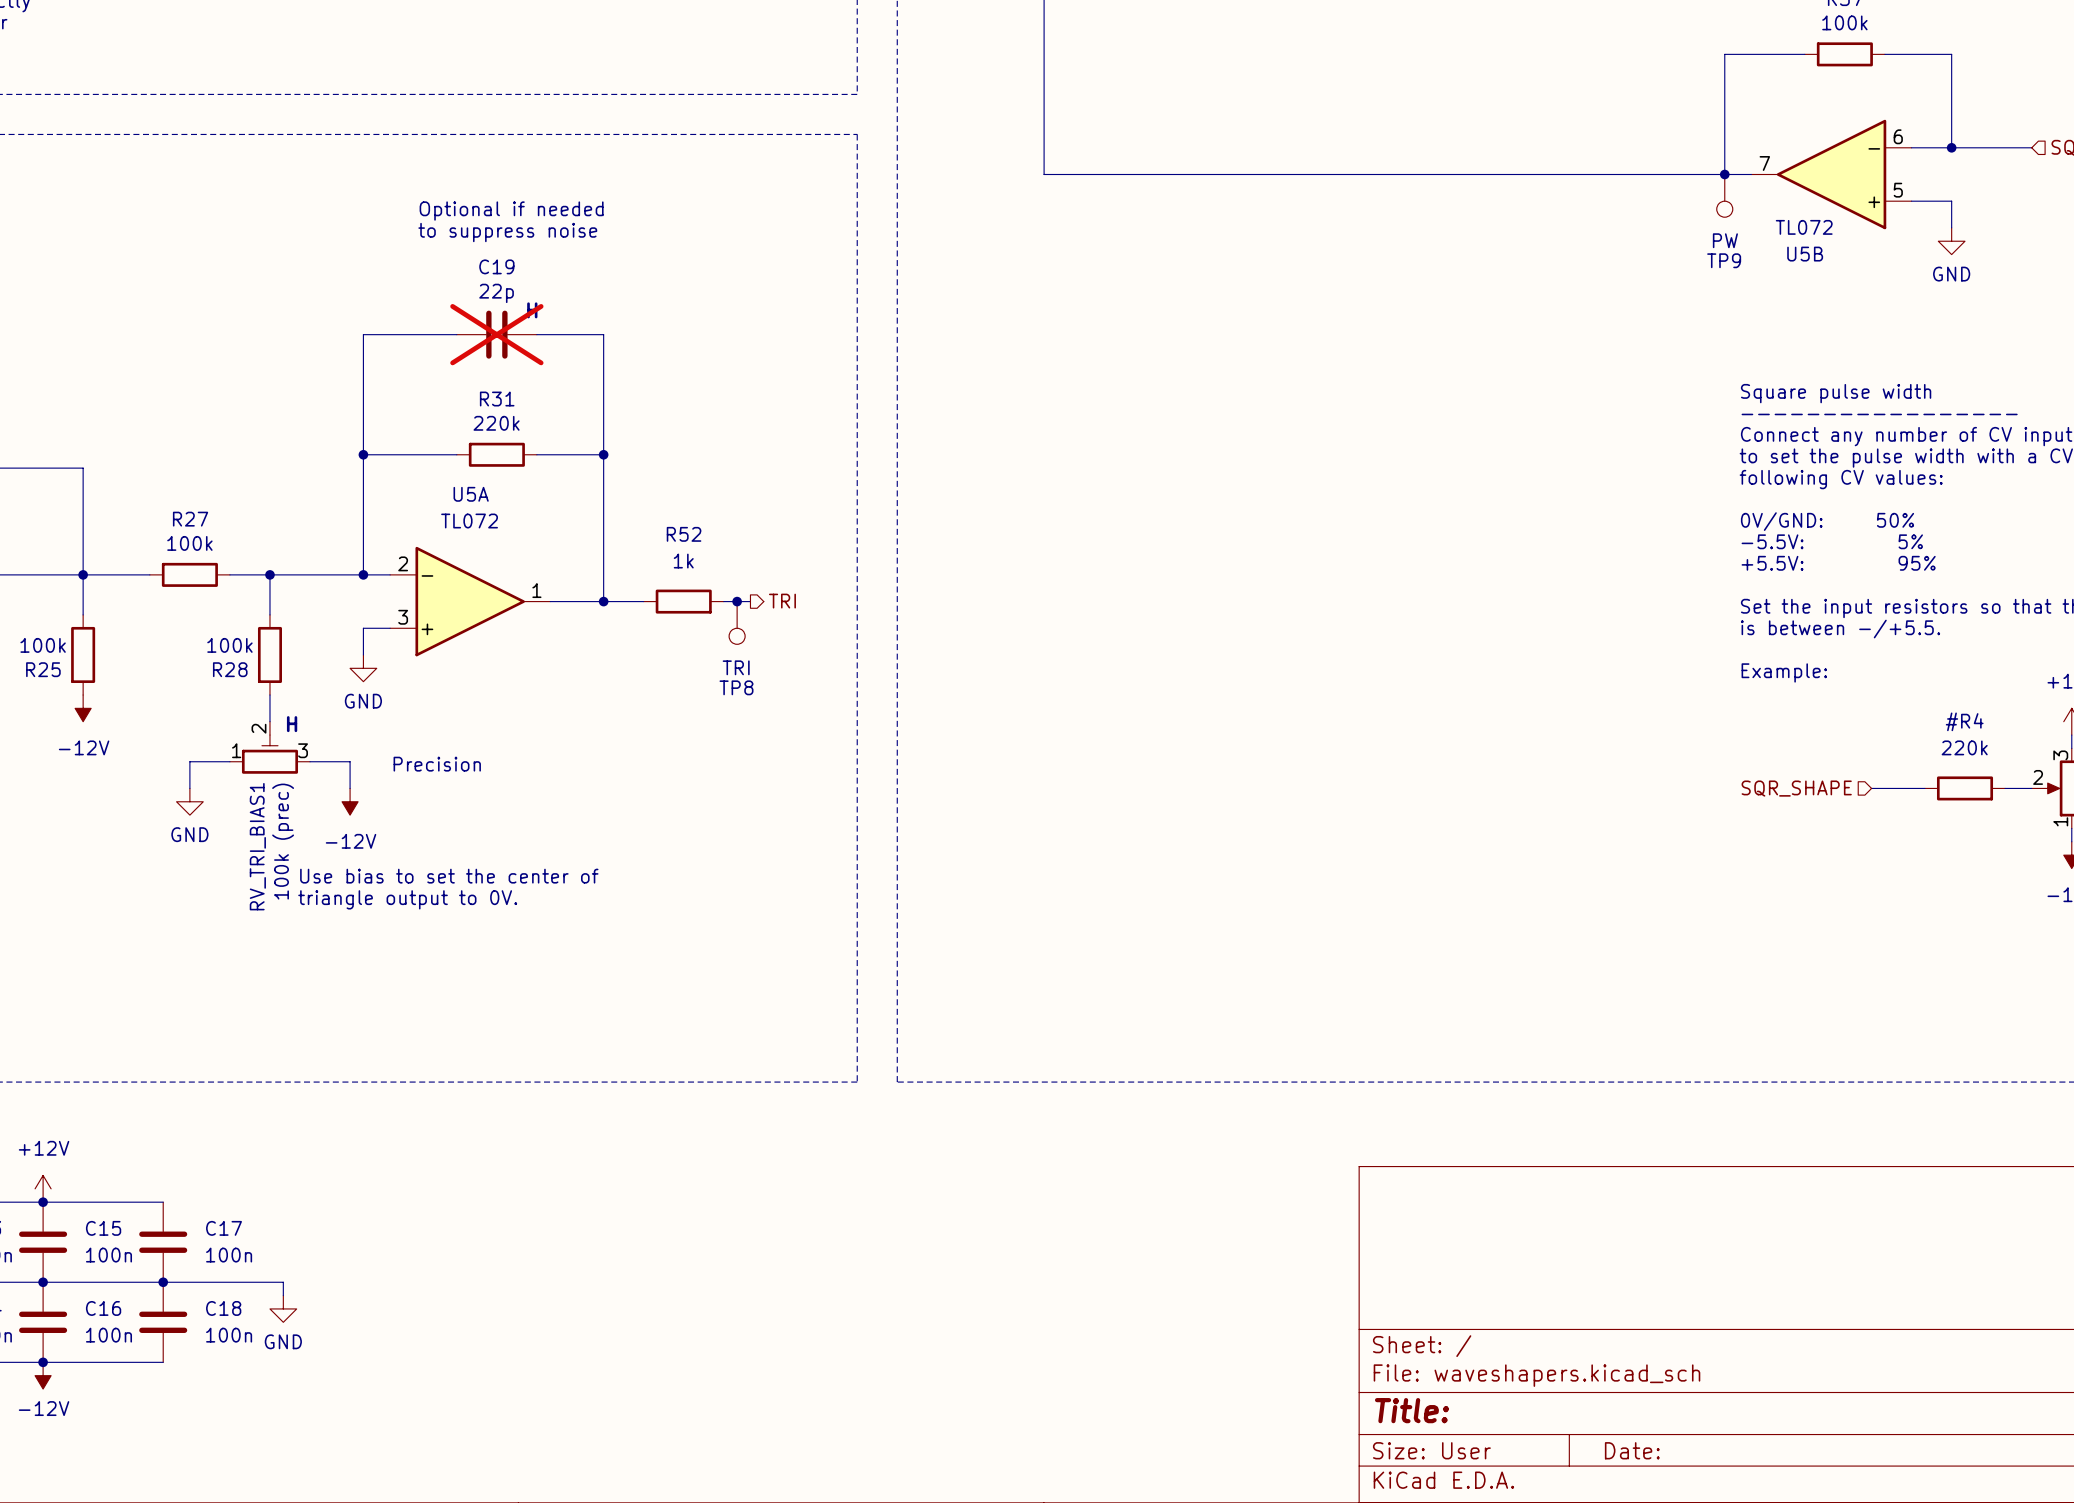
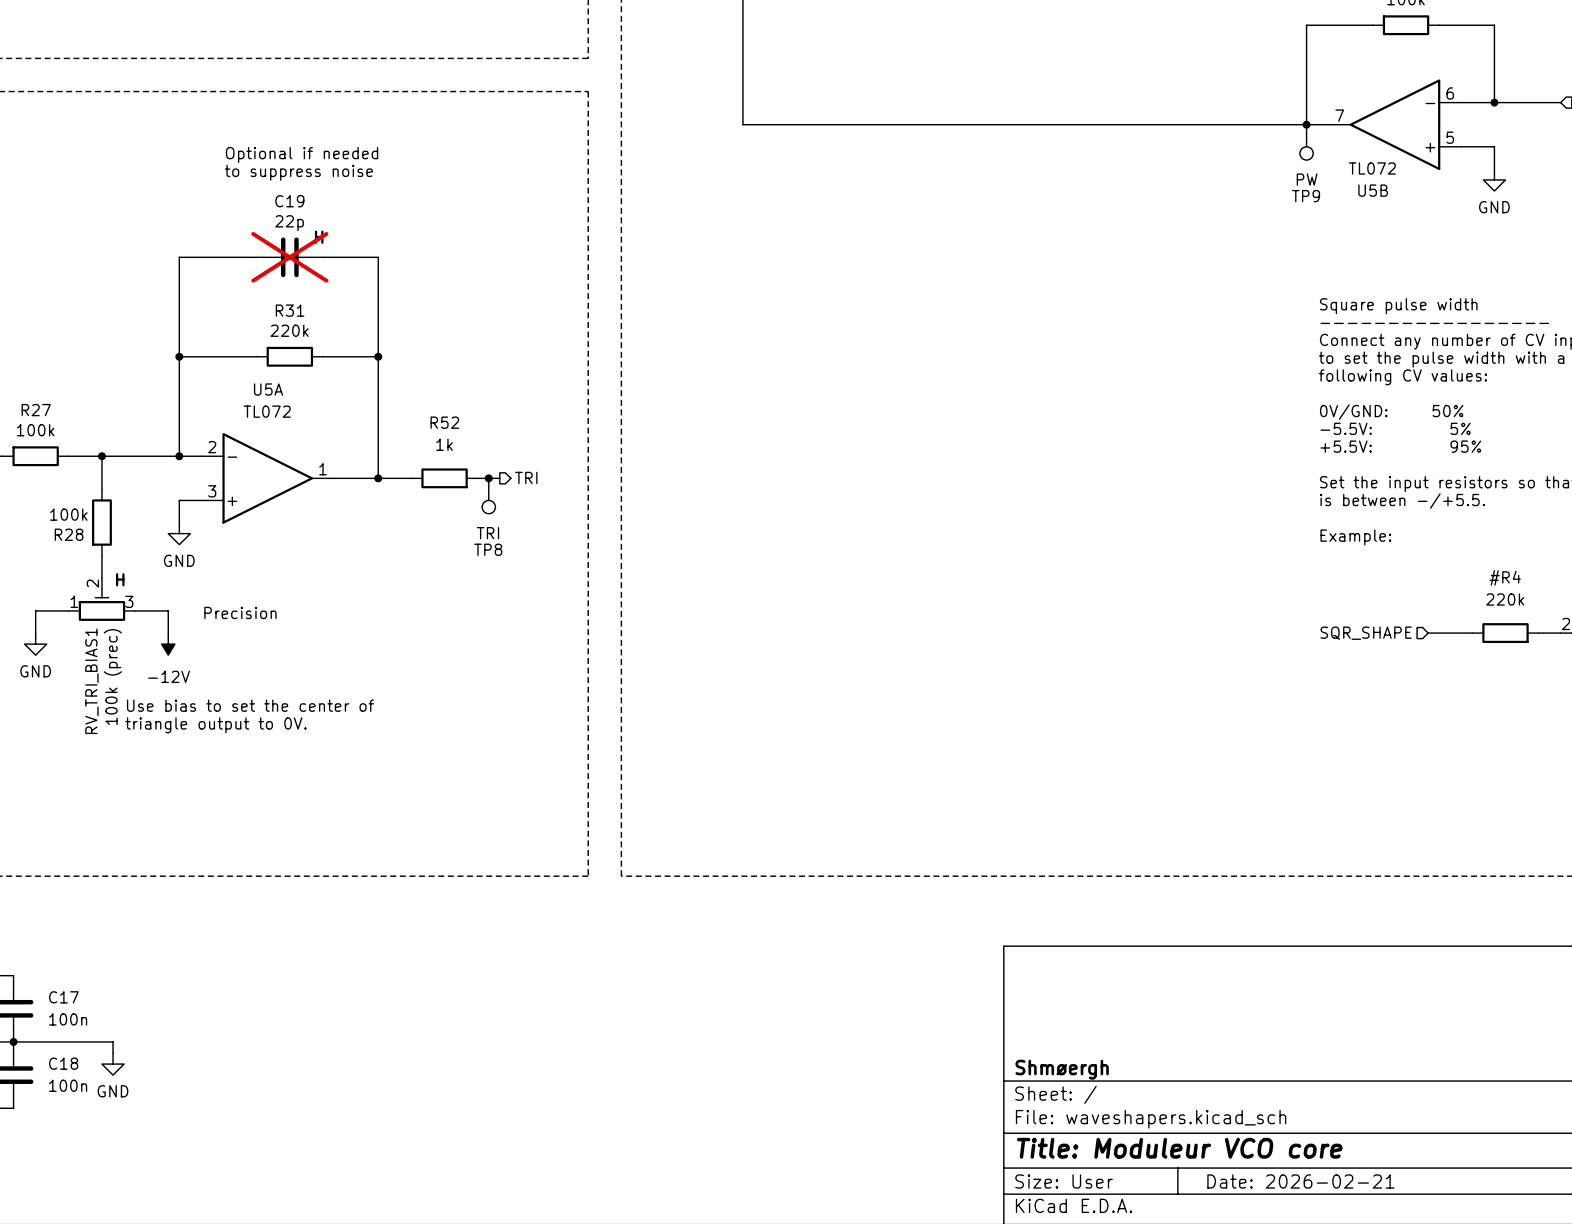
title block: none -> Shmøergh (1062, 1069)
title block: Title: (1412, 1410) -> Title: Moduleur VCO core (1179, 1148)
title block: Date: (1632, 1450) -> Date: 2026-02-21 (1300, 1181)

